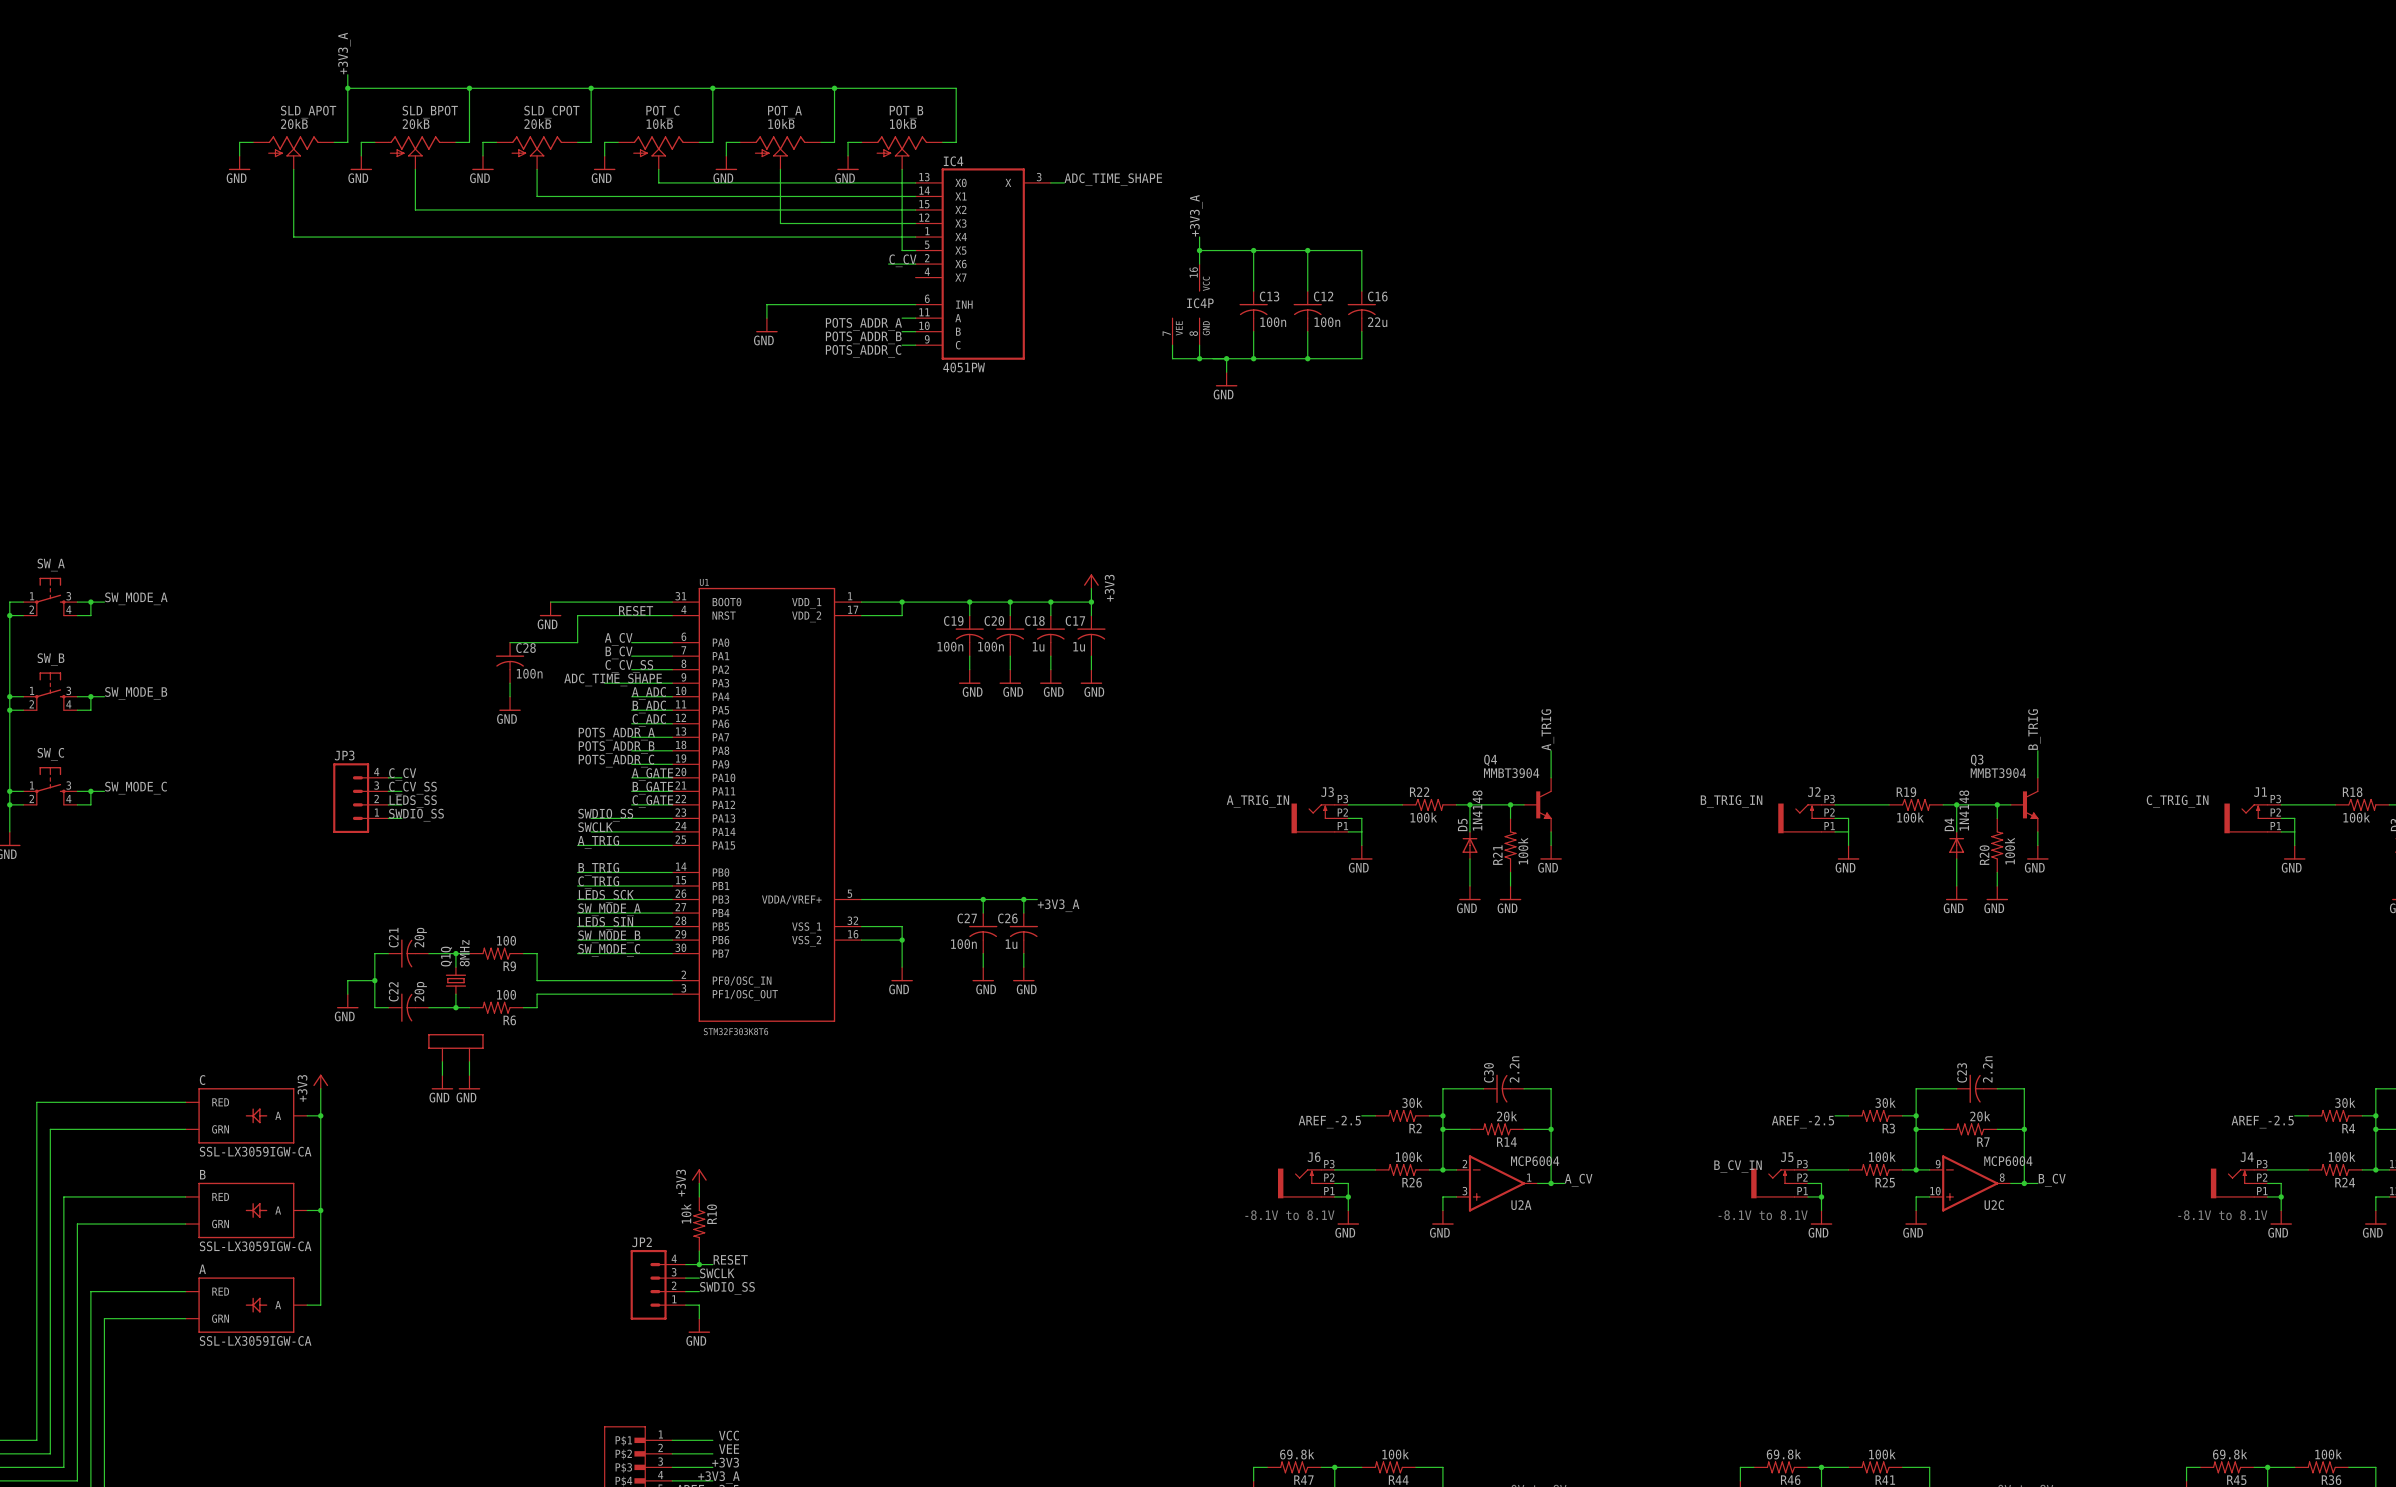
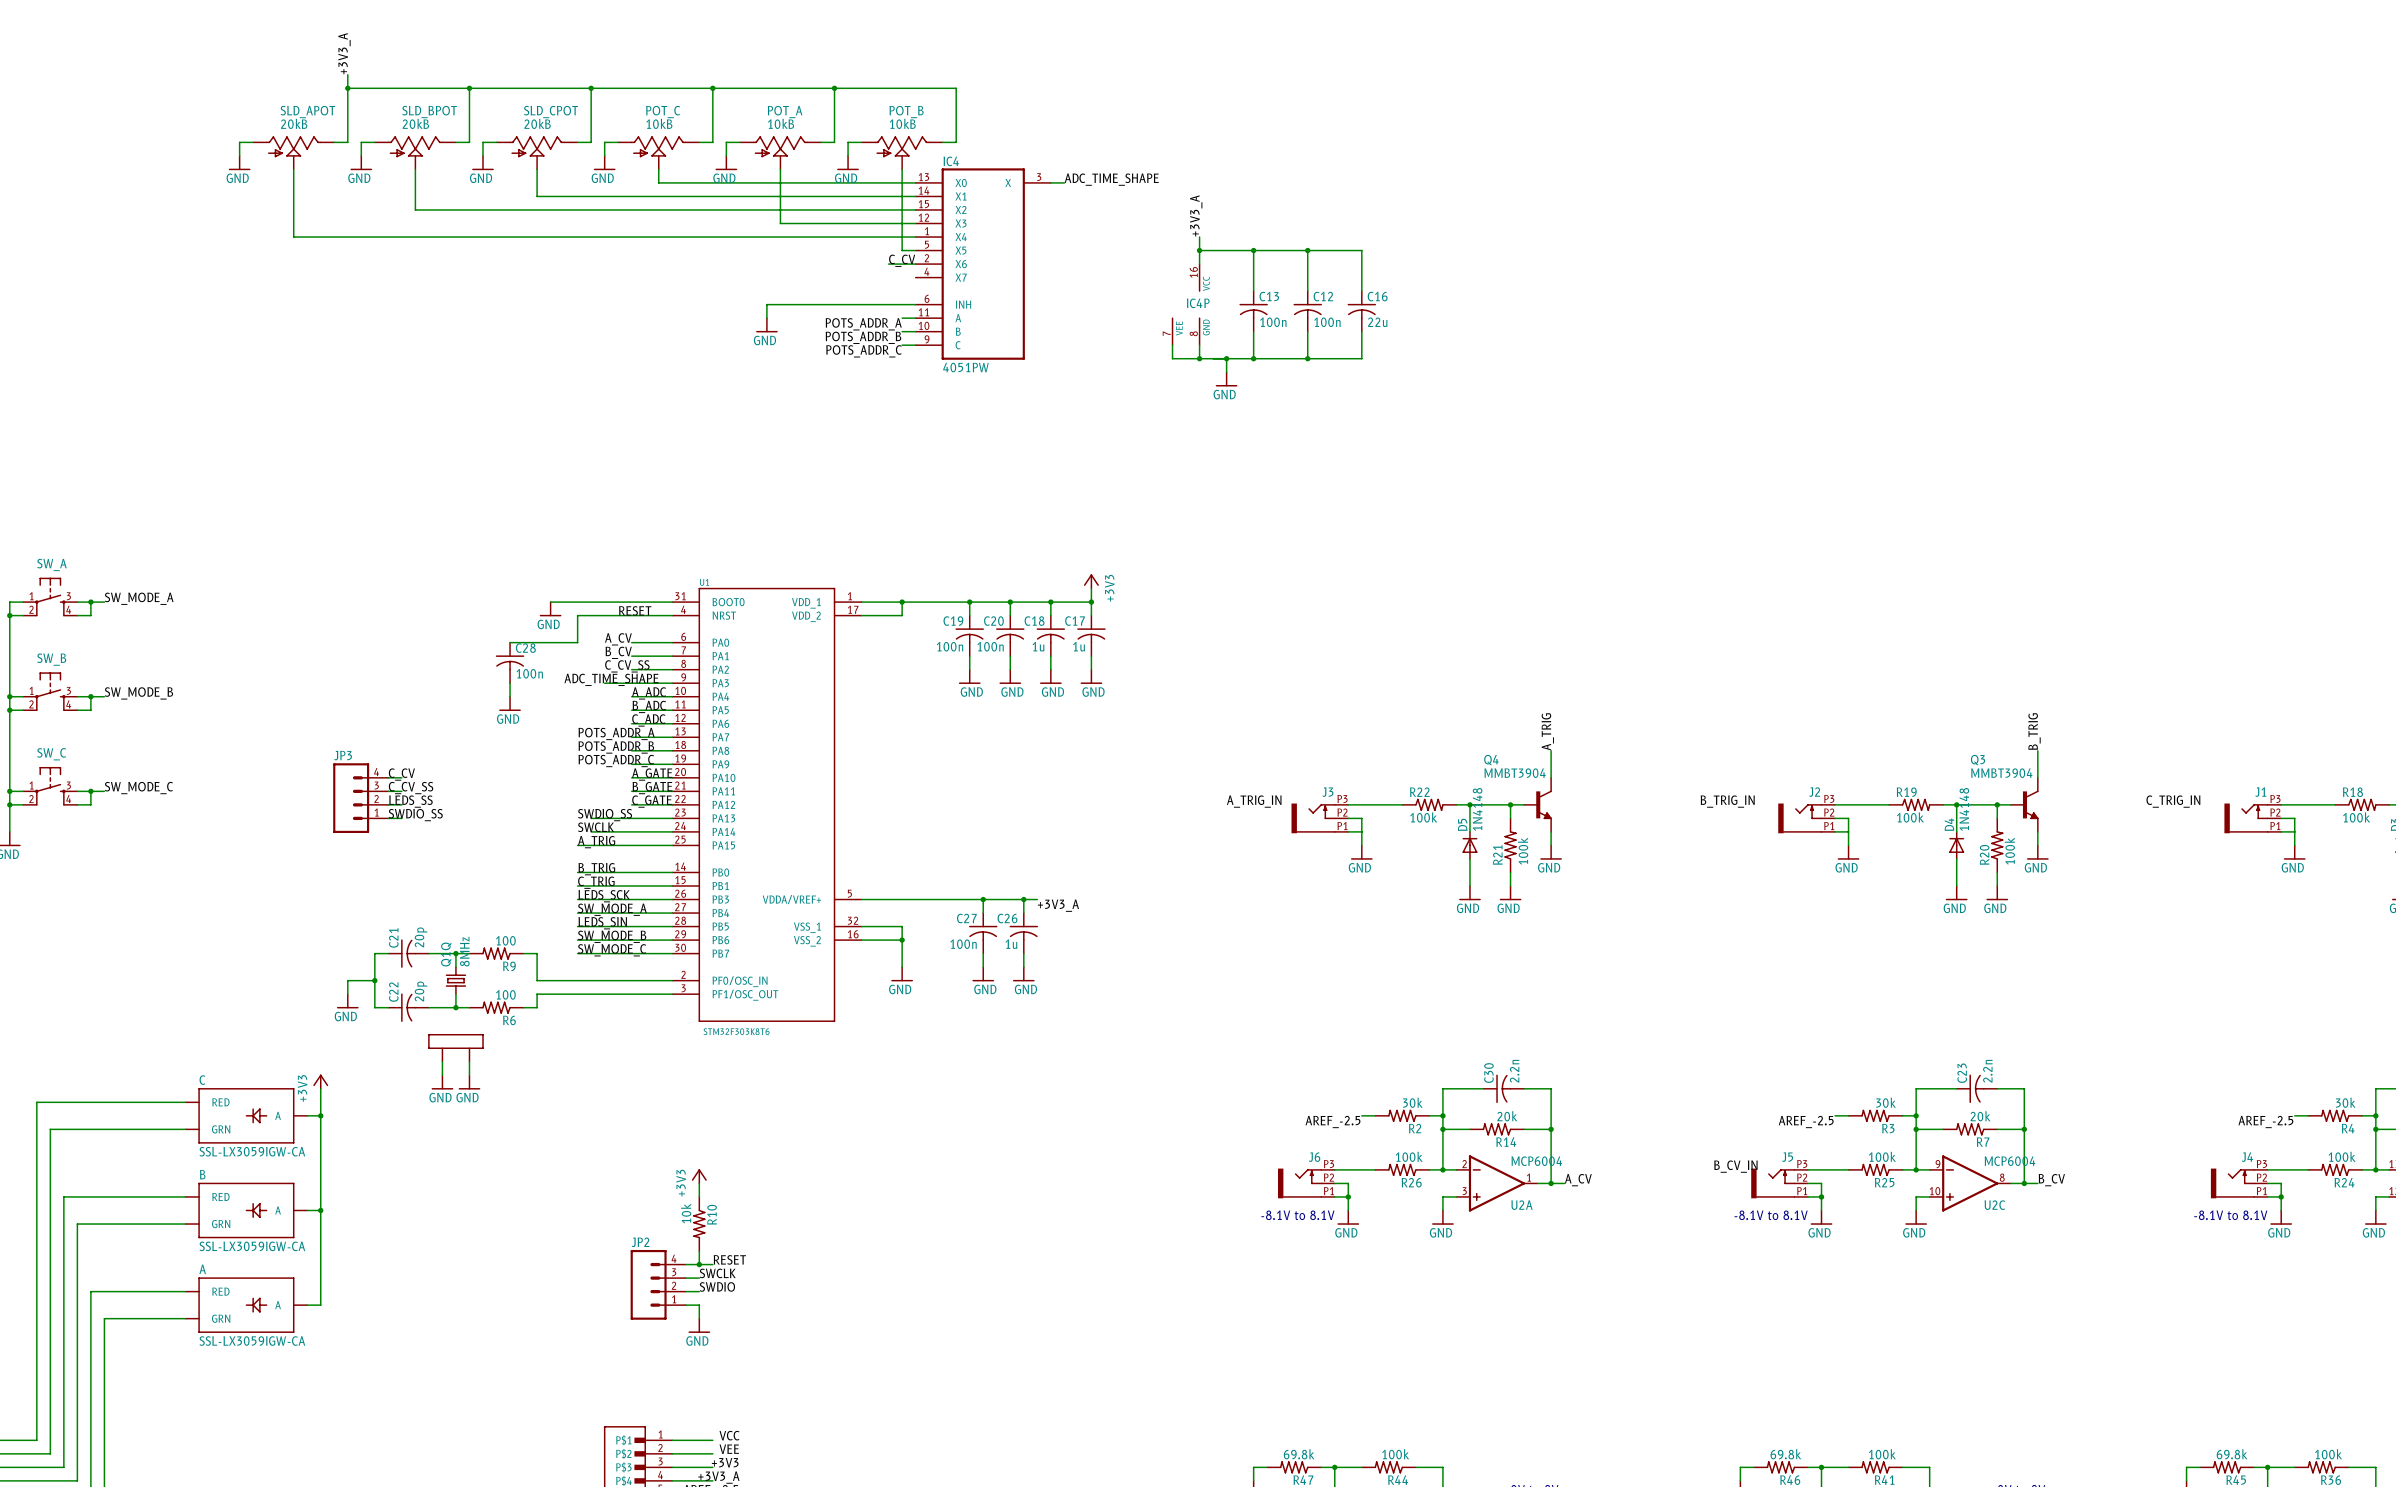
label: SWDIO_SS (727, 1288) -> SWDIO (717, 1286)

